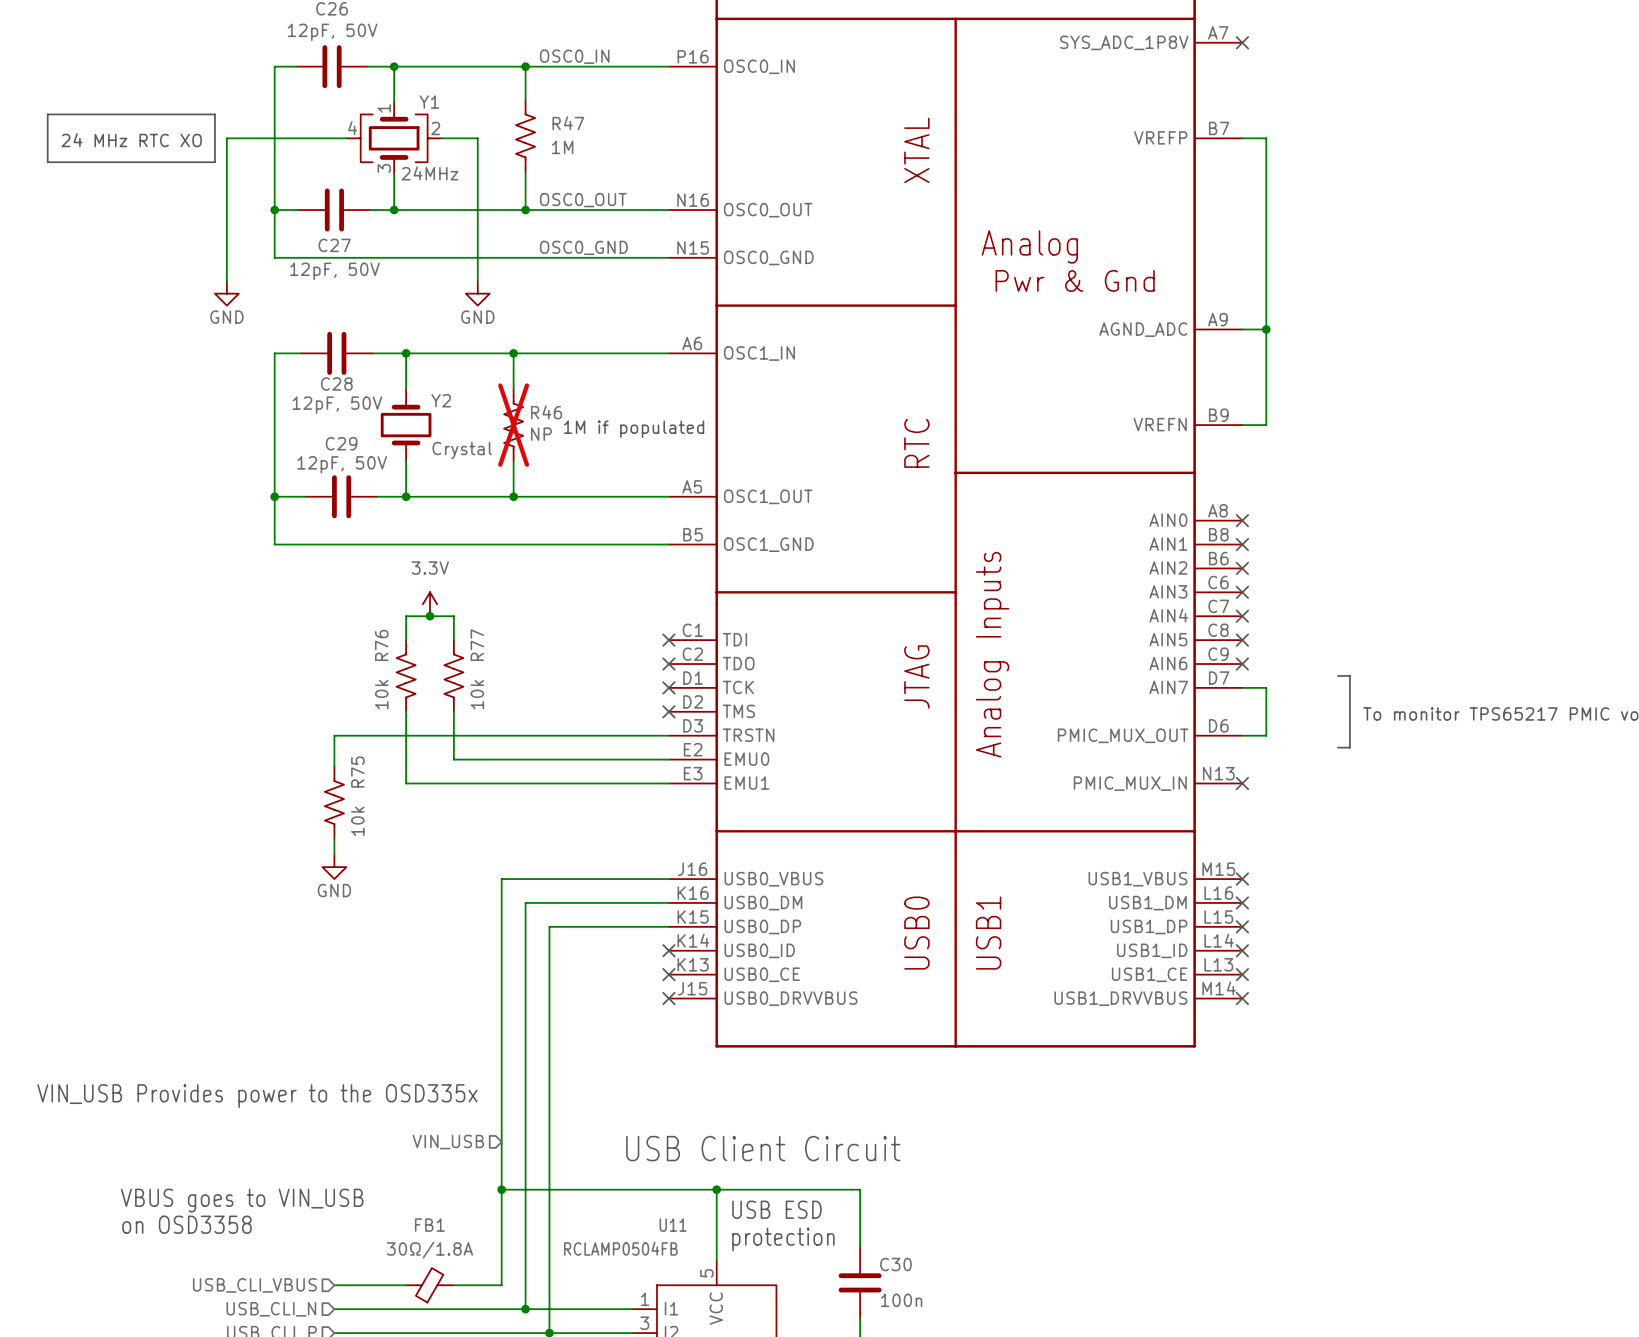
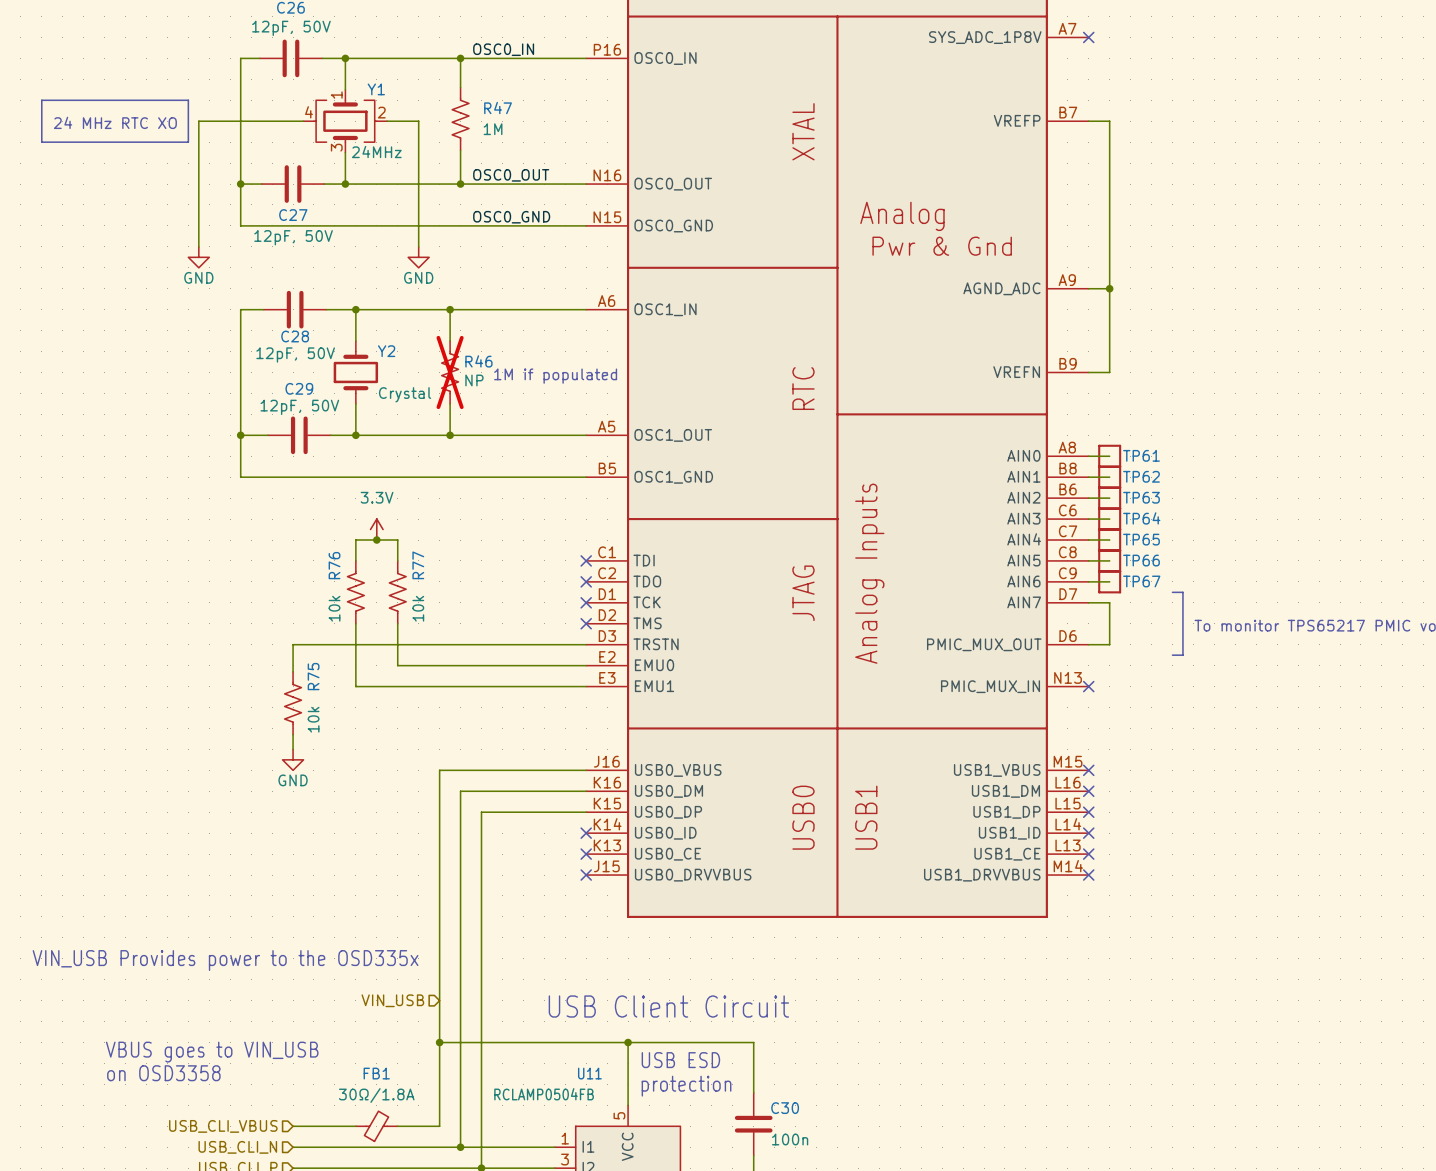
wire: none -> (1088, 456) (1109, 456)
no-connect mark: (1242, 520) -> none
TP61: none -> (1109, 456)
wire: none -> (1088, 477) (1109, 477)
no-connect mark: (1242, 544) -> none
TP62: none -> (1109, 477)
wire: none -> (1088, 498) (1109, 498)
no-connect mark: (1242, 568) -> none
TP63: none -> (1109, 498)
wire: none -> (1088, 519) (1109, 519)
no-connect mark: (1242, 592) -> none
TP64: none -> (1109, 519)
wire: none -> (1088, 540) (1109, 540)
no-connect mark: (1242, 616) -> none
TP65: none -> (1109, 540)
wire: none -> (1088, 560) (1109, 560)
no-connect mark: (1242, 640) -> none
TP66: none -> (1109, 560)
wire: none -> (1088, 581) (1109, 581)
no-connect mark: (1242, 664) -> none
TP67: none -> (1109, 581)

